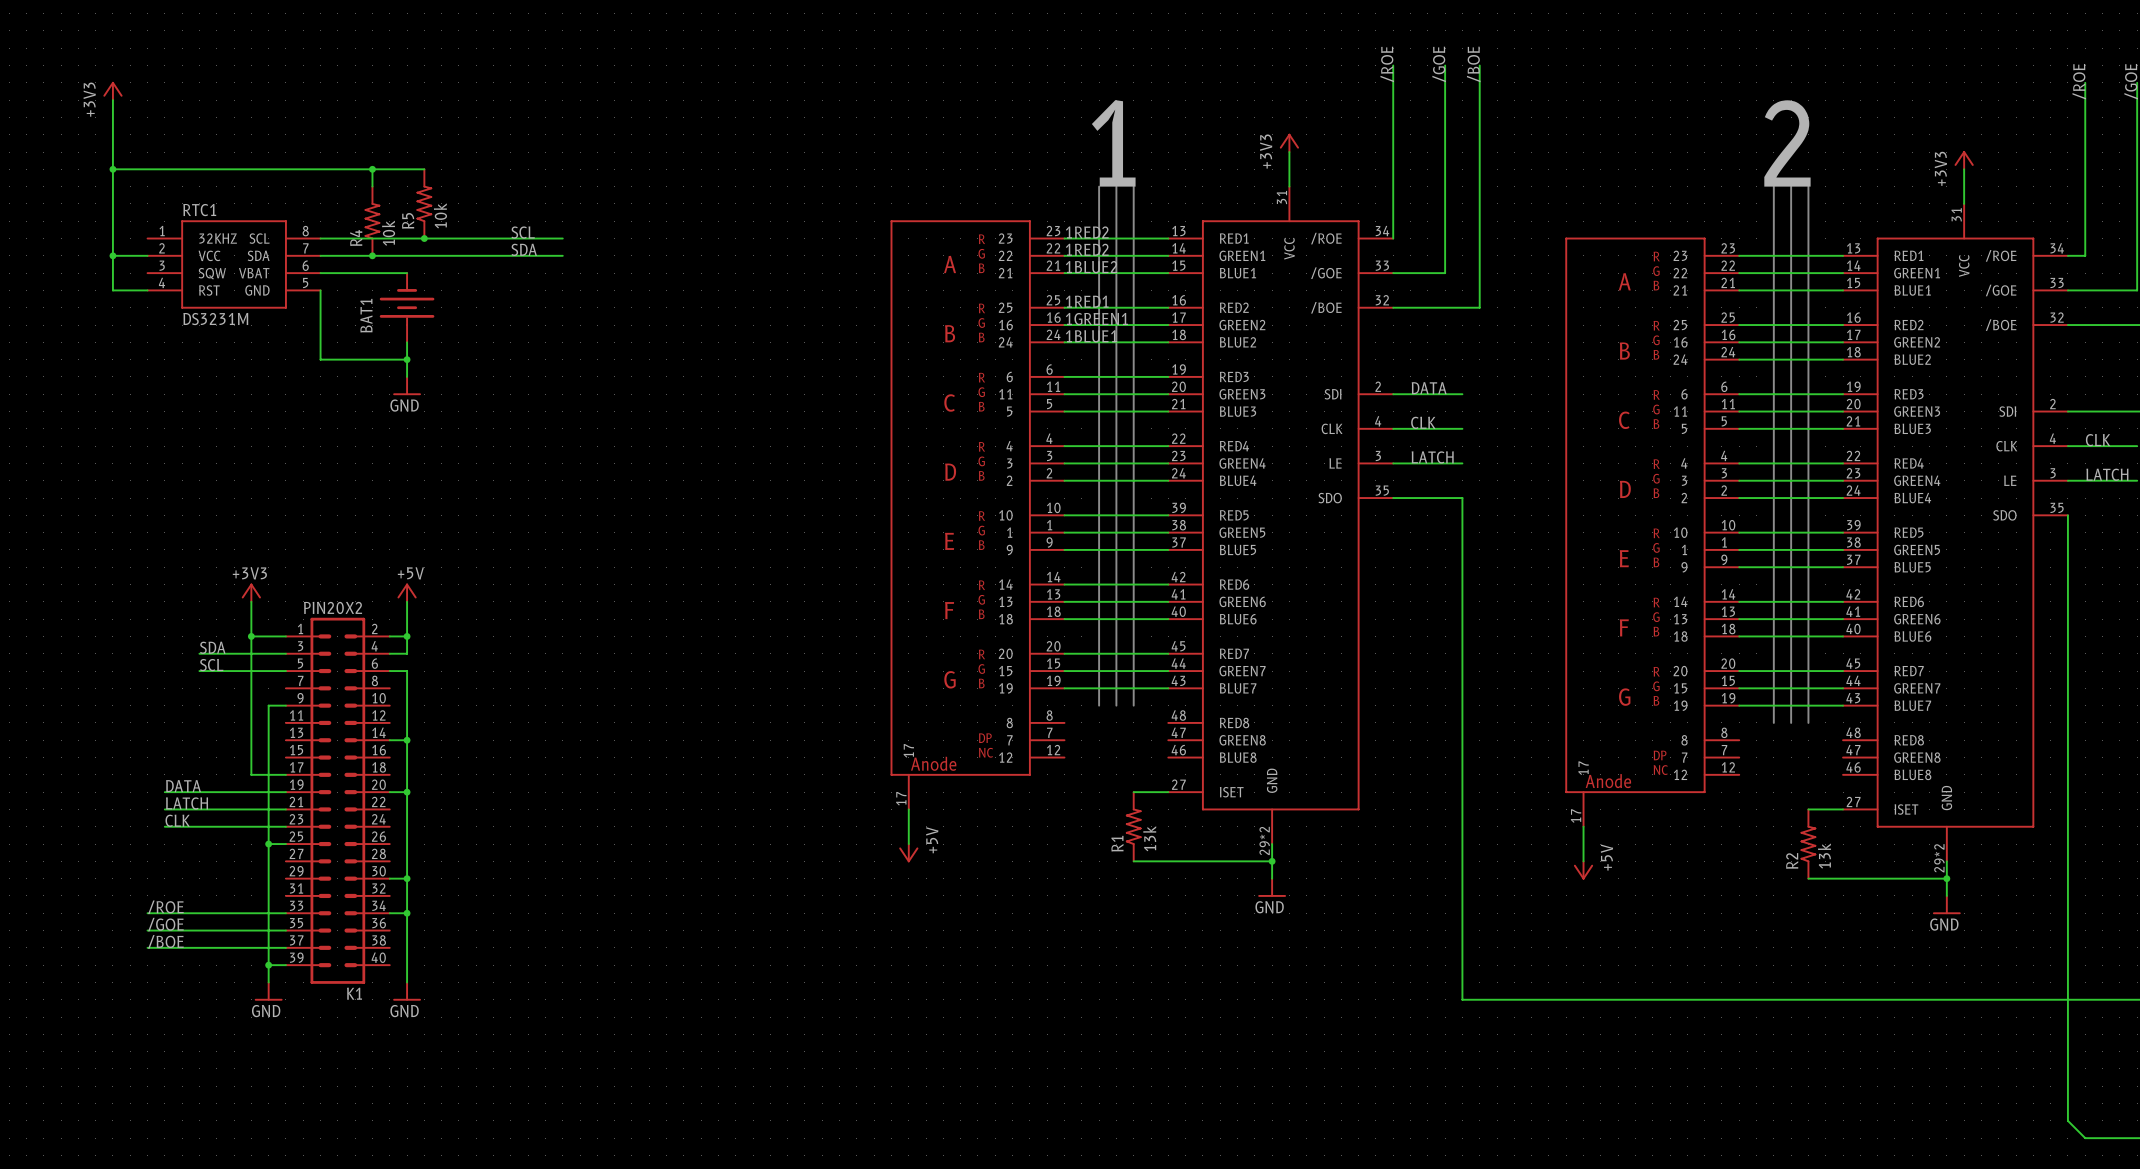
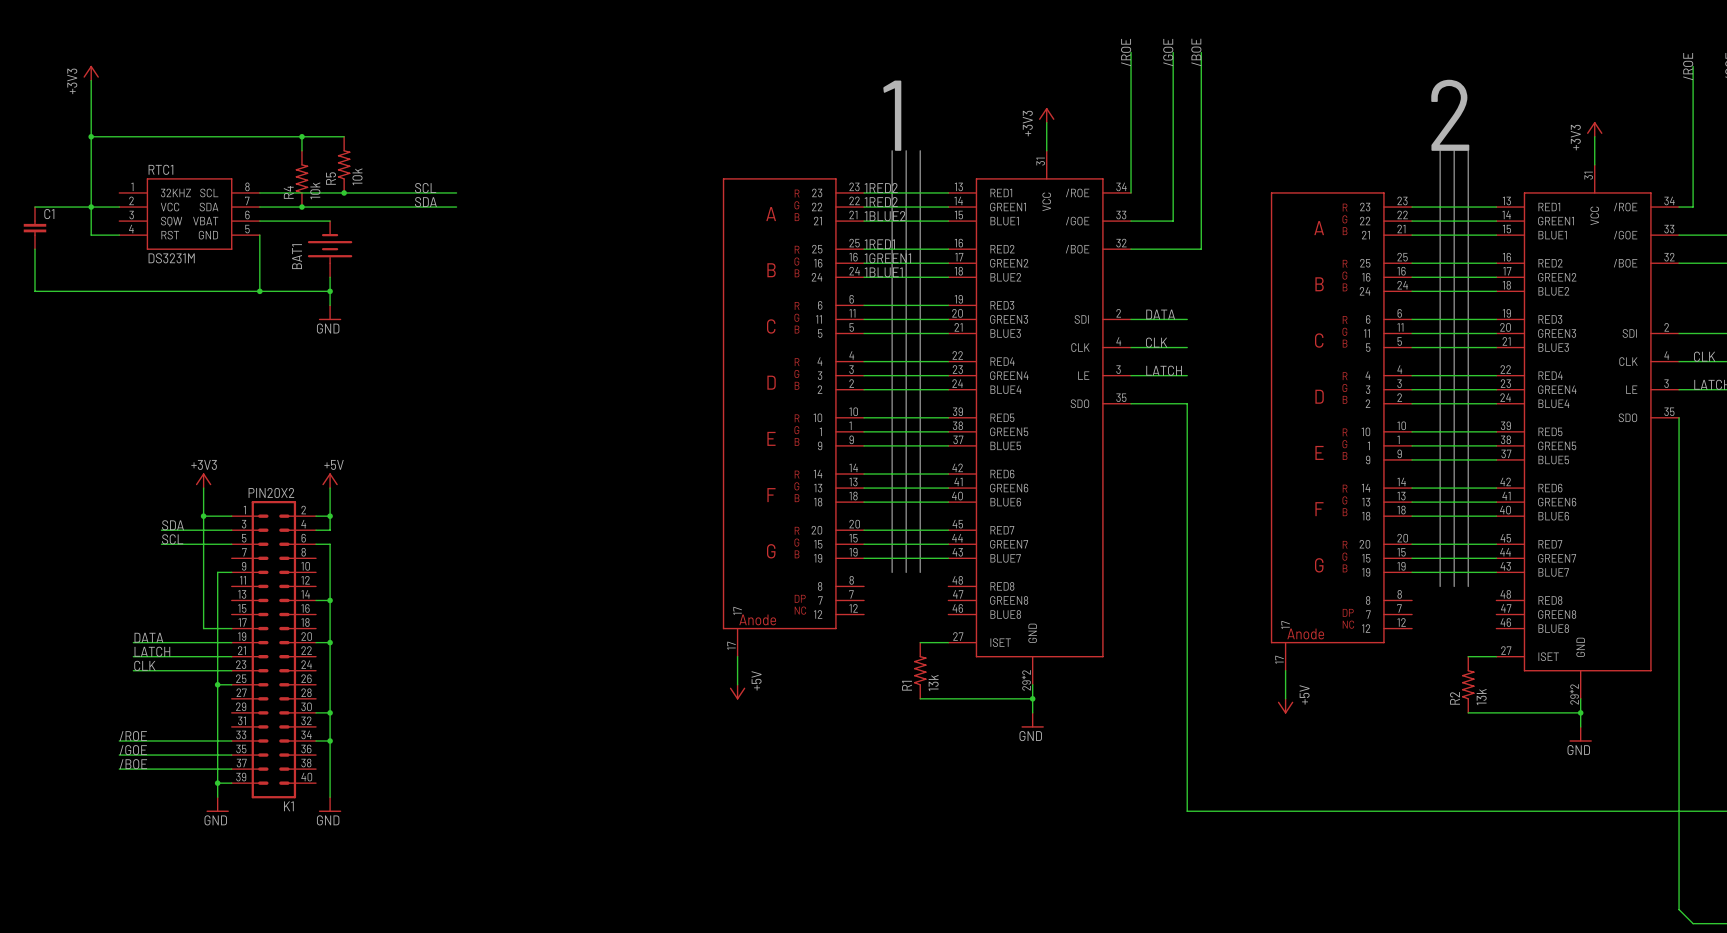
wire: none -> (34, 207) (91, 207)
C1: none -> (34, 228)
wire: none -> (34, 249) (34, 291) (259, 291)
junction: none -> (259, 291)

